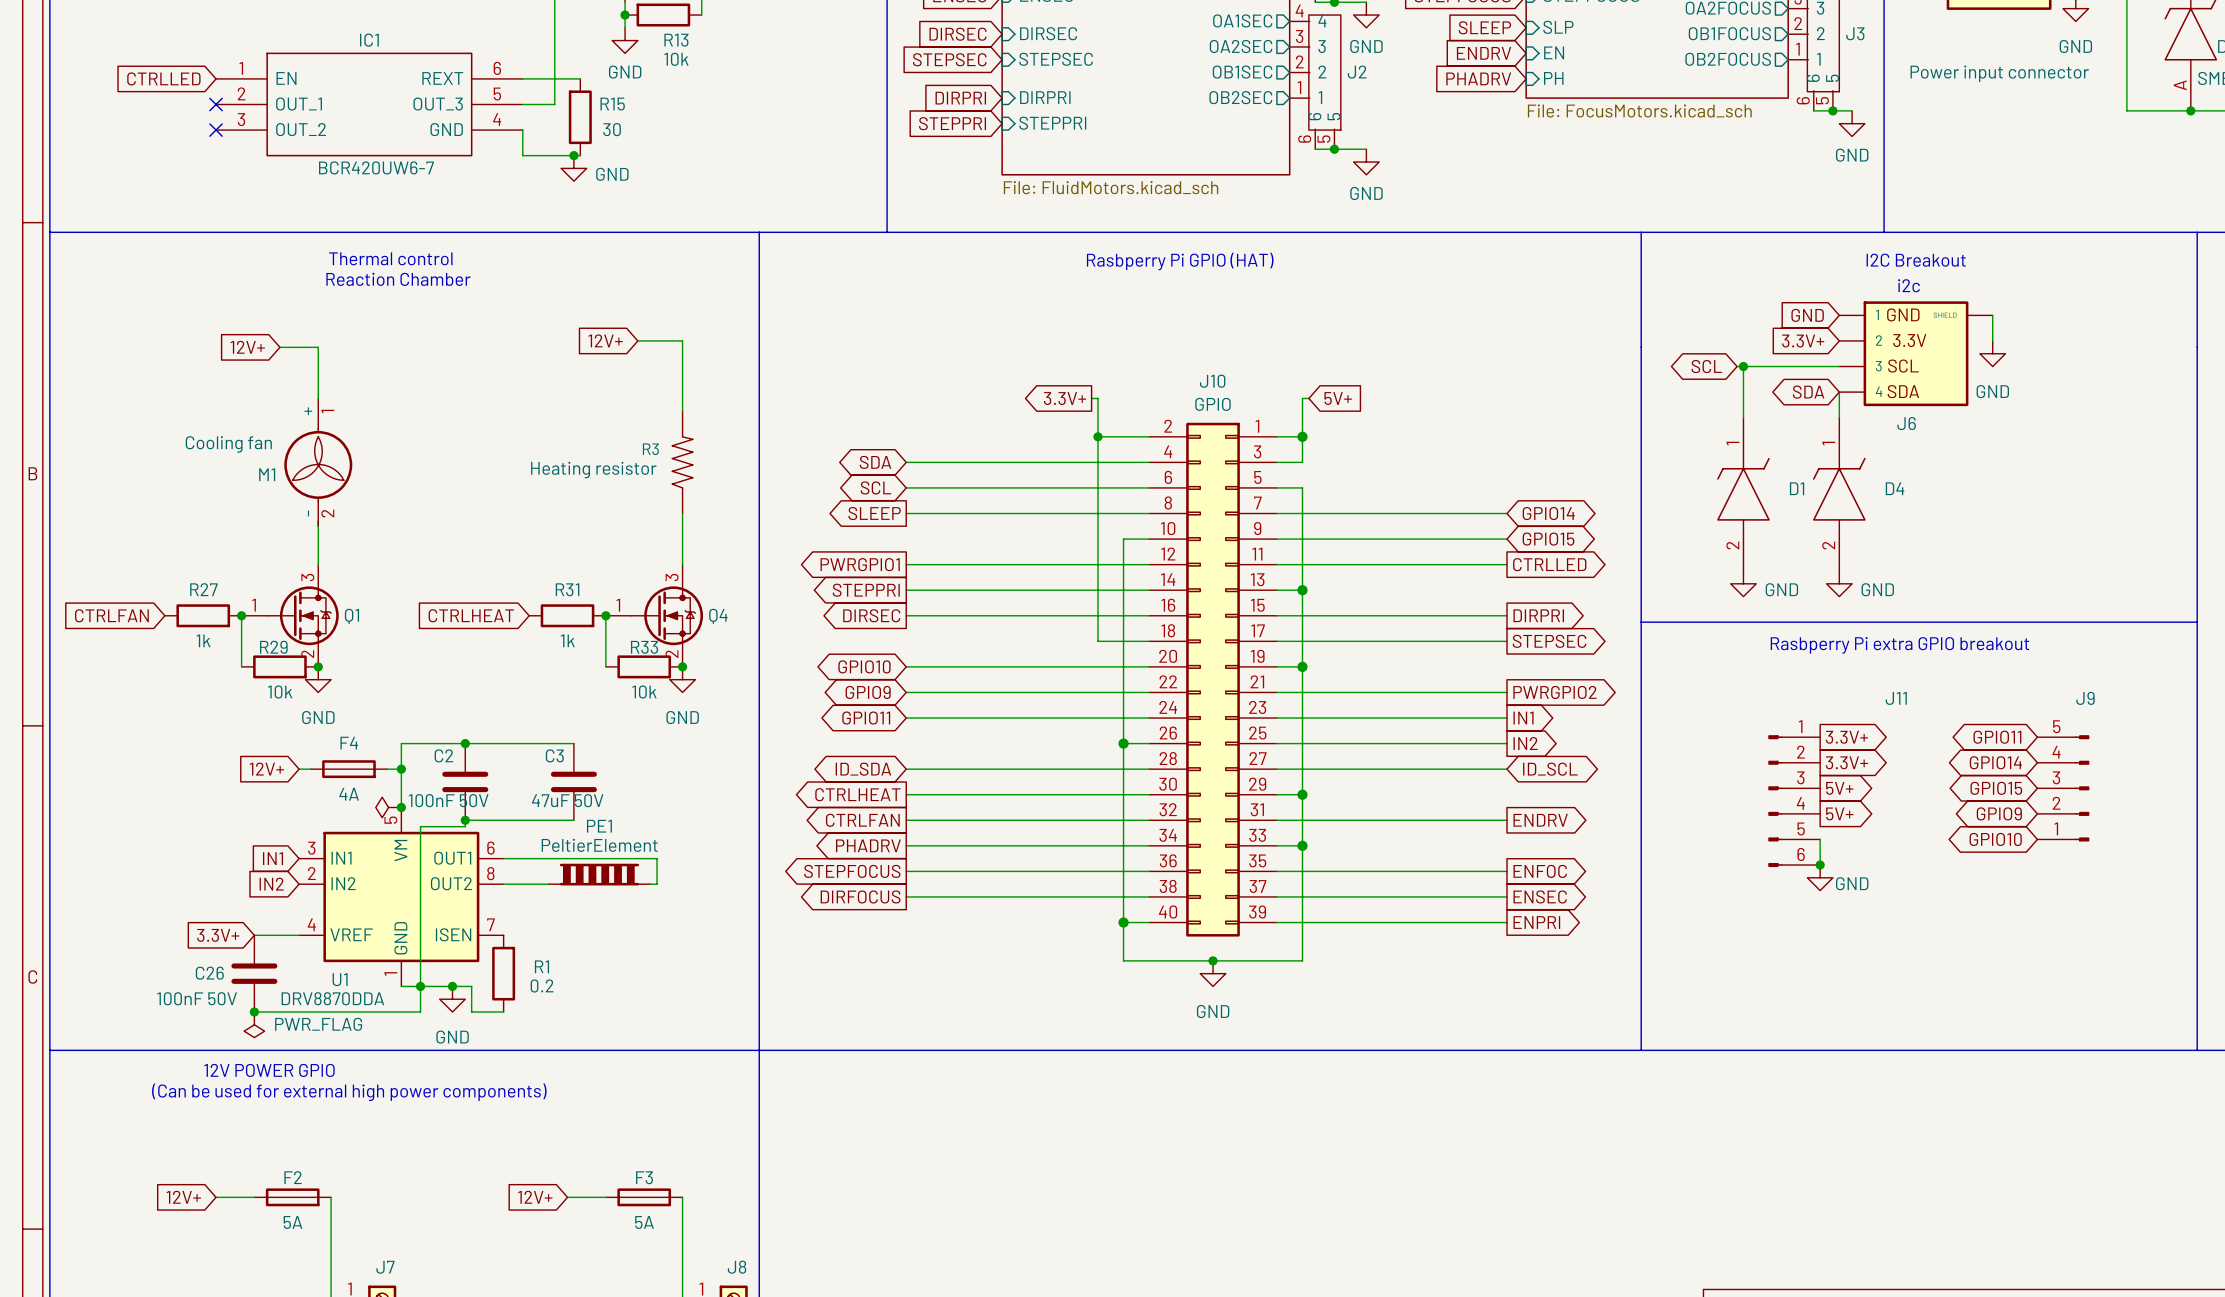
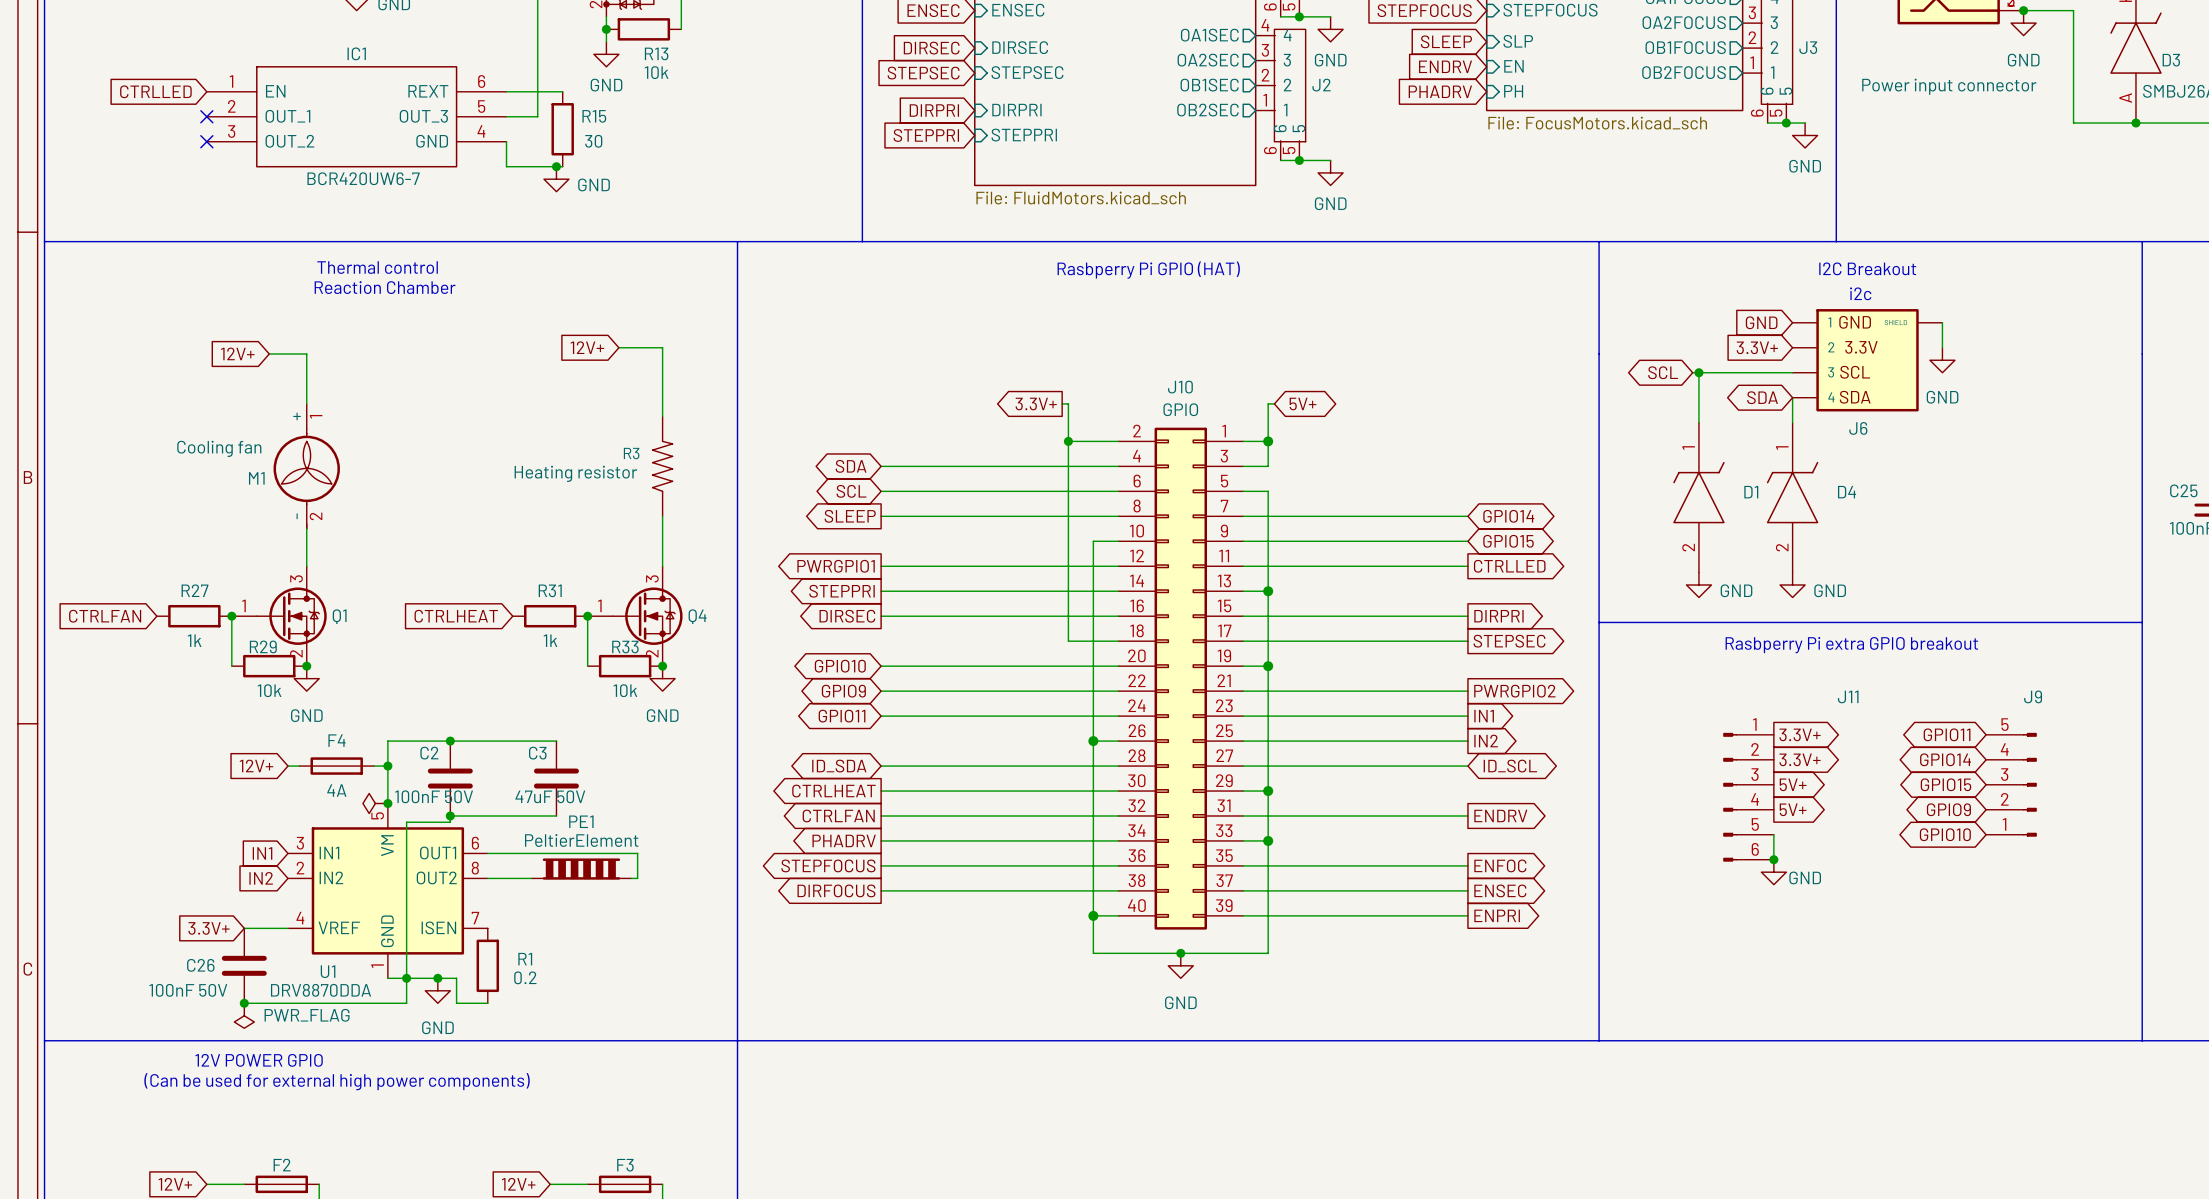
global label shape: input (1338, 398) -> bidirectional (1303, 404)

